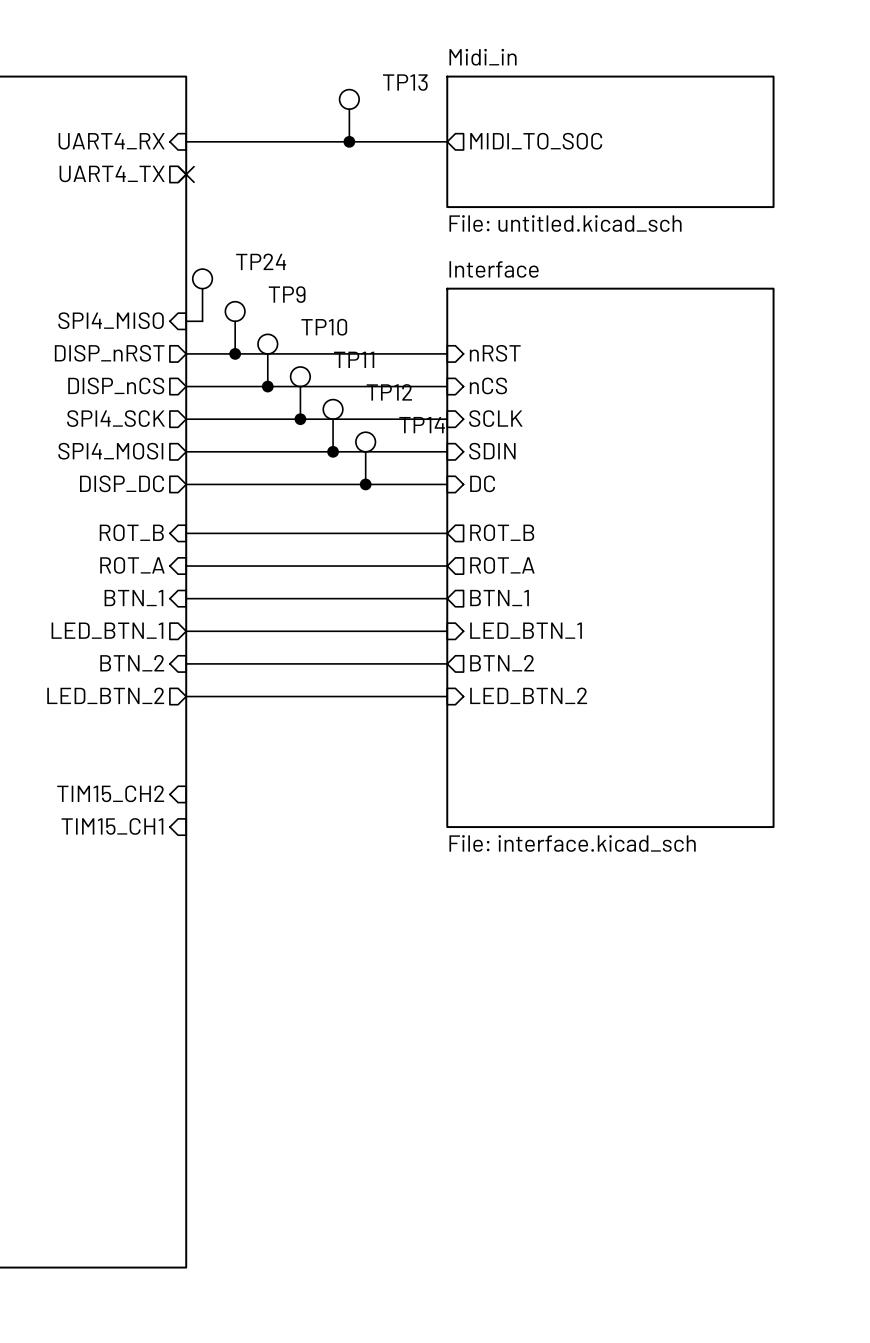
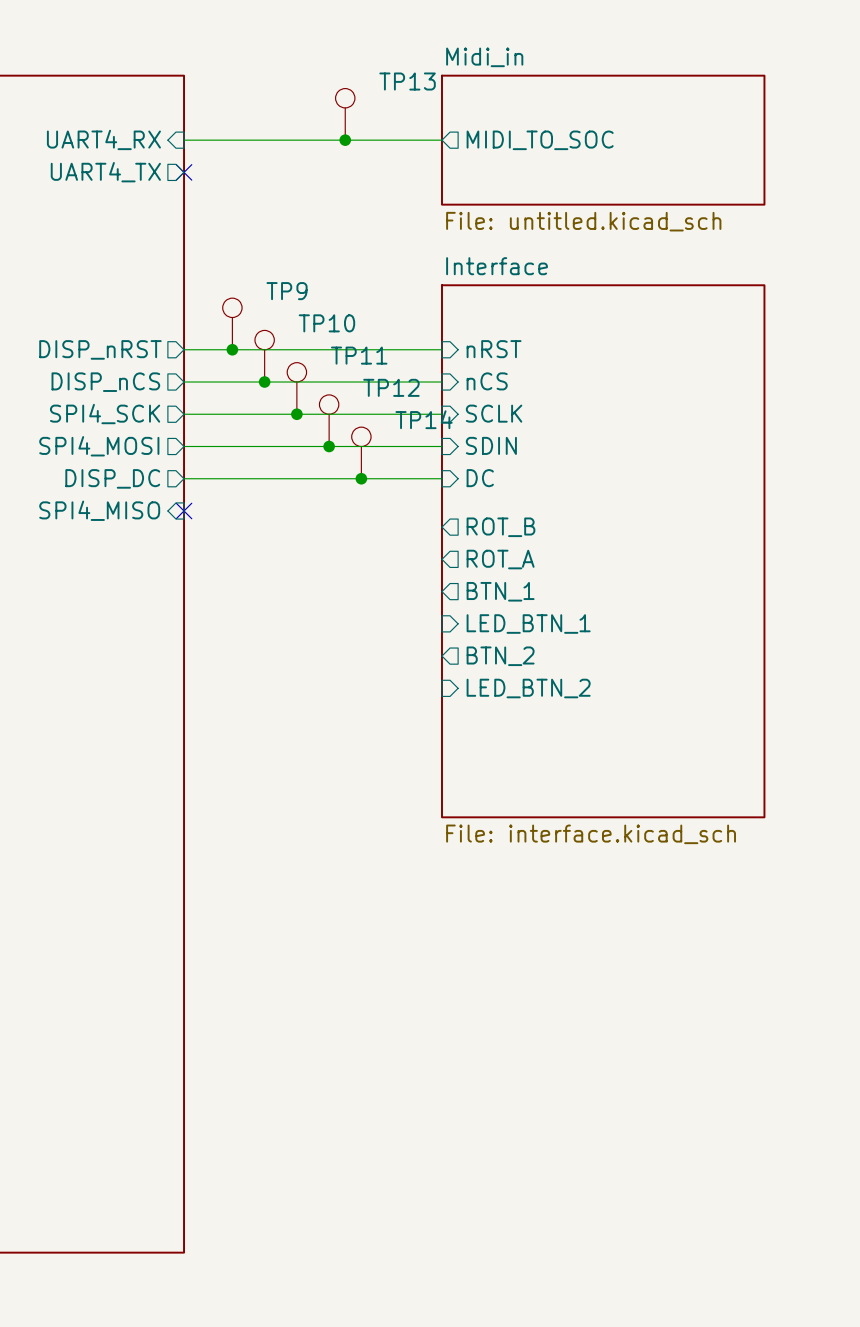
TP24: (202, 295) -> none
sheet pin position: SPI4_MISO (111, 320) -> SPI4_MISO (99, 510)
wire: (186, 321) (202, 321) -> none
no-connect mark: none -> (184, 510)
sheet pin: ROT_B (131, 532) -> none
wire: (186, 533) (447, 533) -> none
sheet pin: ROT_A (132, 565) -> none
wire: (186, 566) (447, 566) -> none
sheet pin: BTN_1 (133, 598) -> none
wire: (186, 598) (447, 598) -> none
sheet pin: LED_BTN_1 (107, 630) -> none
wire: (186, 631) (447, 631) -> none
sheet pin: BTN_2 (132, 663) -> none
wire: (186, 663) (447, 663) -> none
sheet pin: LED_BTN_2 (105, 695) -> none
wire: (186, 696) (447, 696) -> none
sheet pin: TIM15_CH2 (110, 793) -> none
sheet pin: TIM15_CH1 (112, 826) -> none

